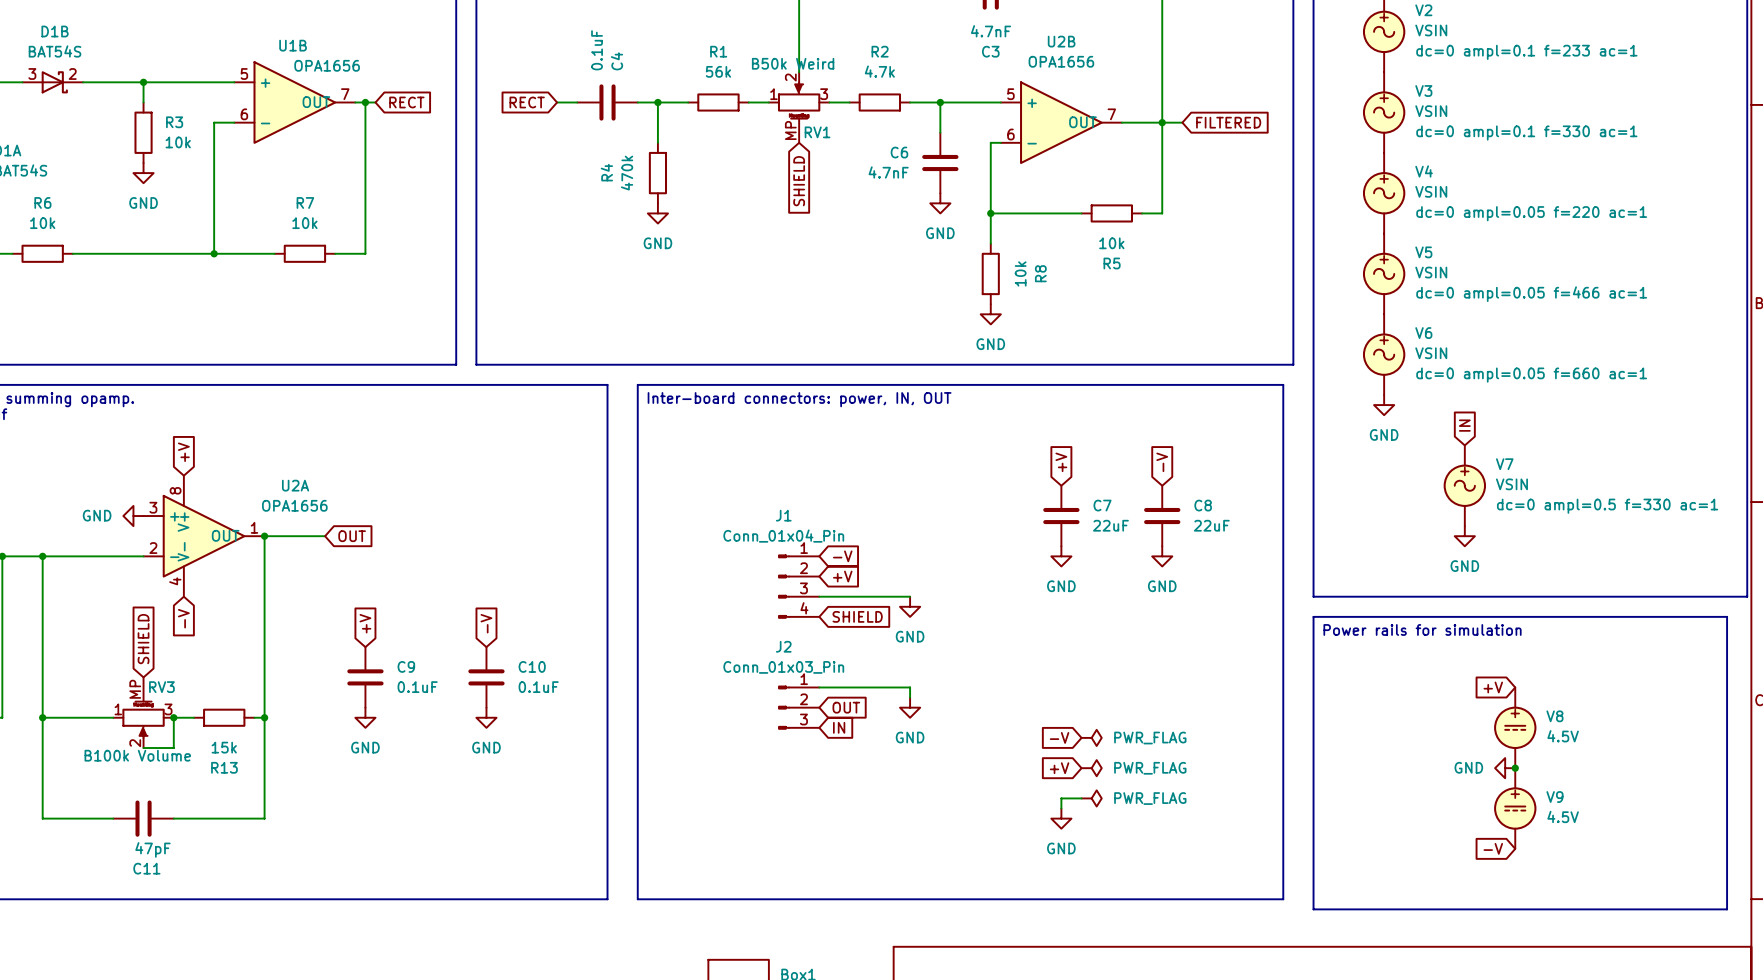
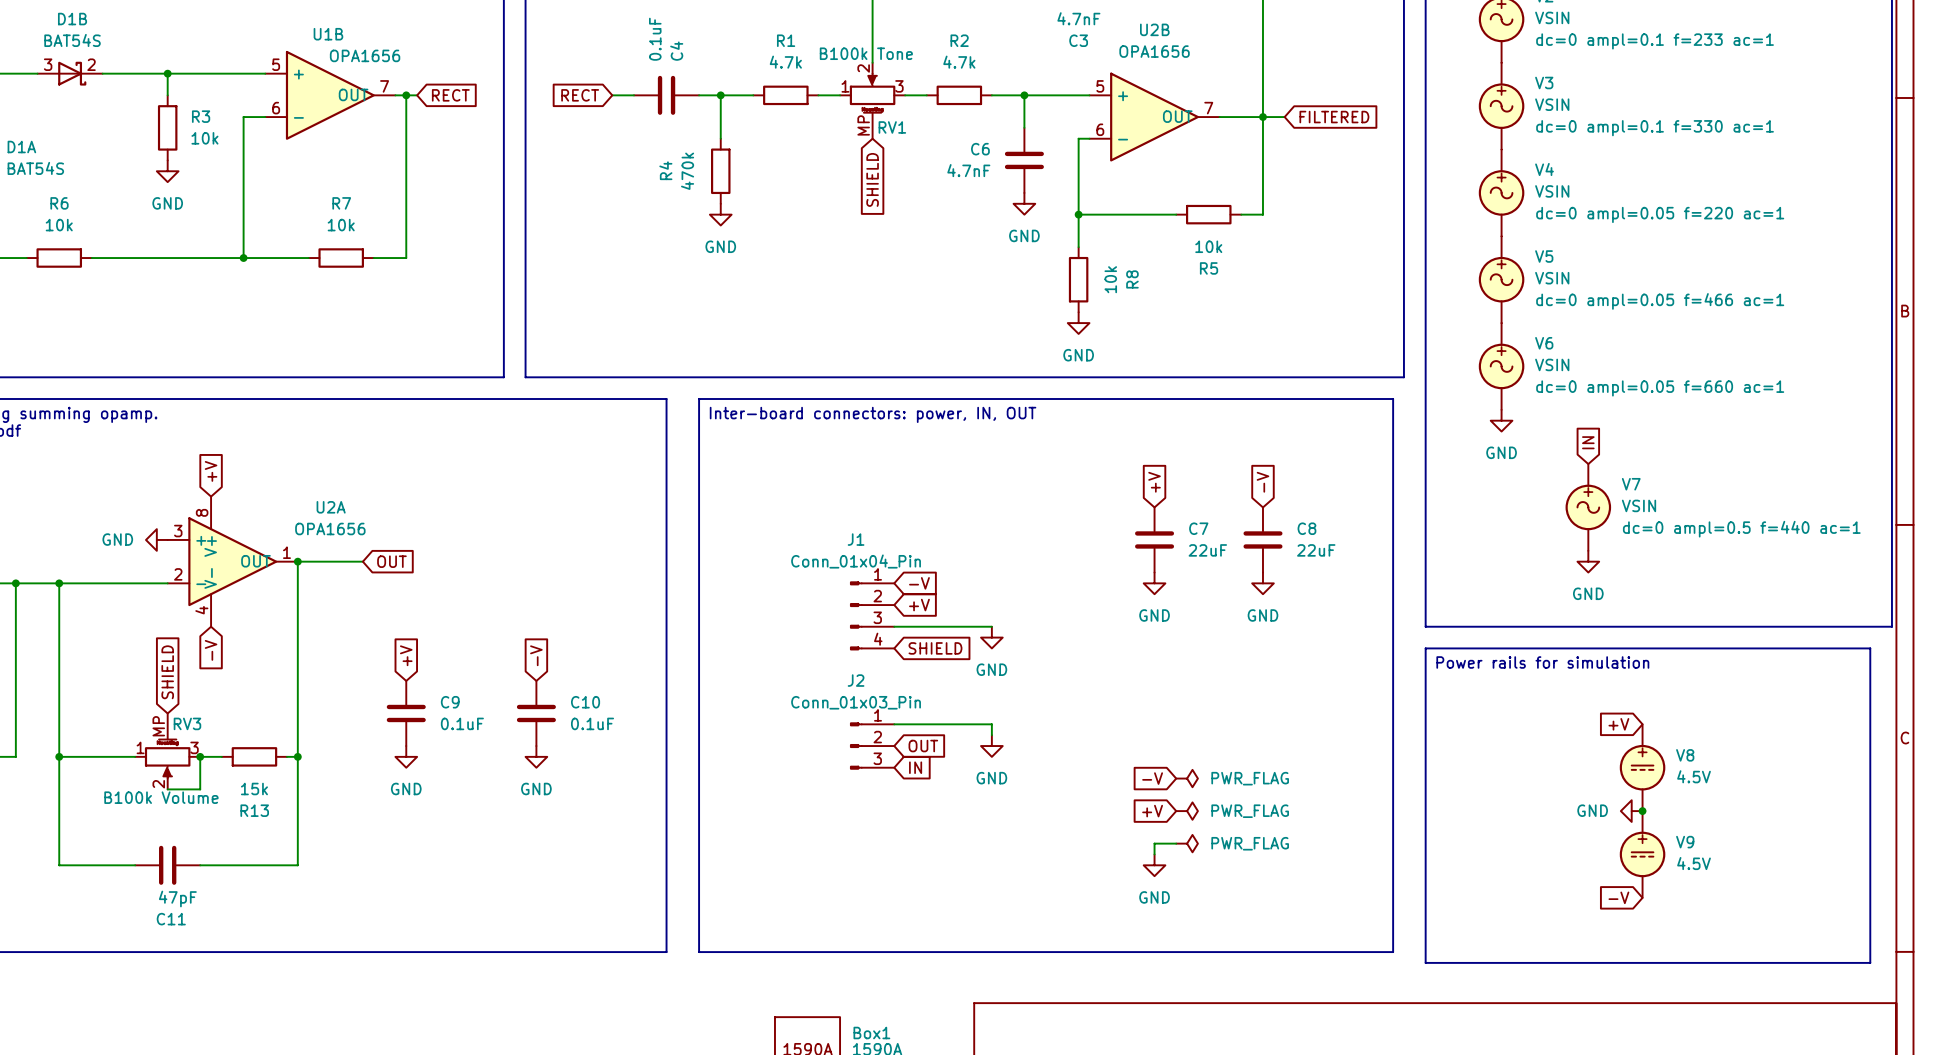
RV1 value: B50k Weird (793, 63) -> B100k Tone (866, 53)
R1 value: 56k (718, 71) -> 4.7k (785, 62)
V7 text: dc=0 ampl=0.5 f=330 ac=1 (1607, 506) -> dc=0 ampl=0.5 f=440 ac=1 (1741, 529)

